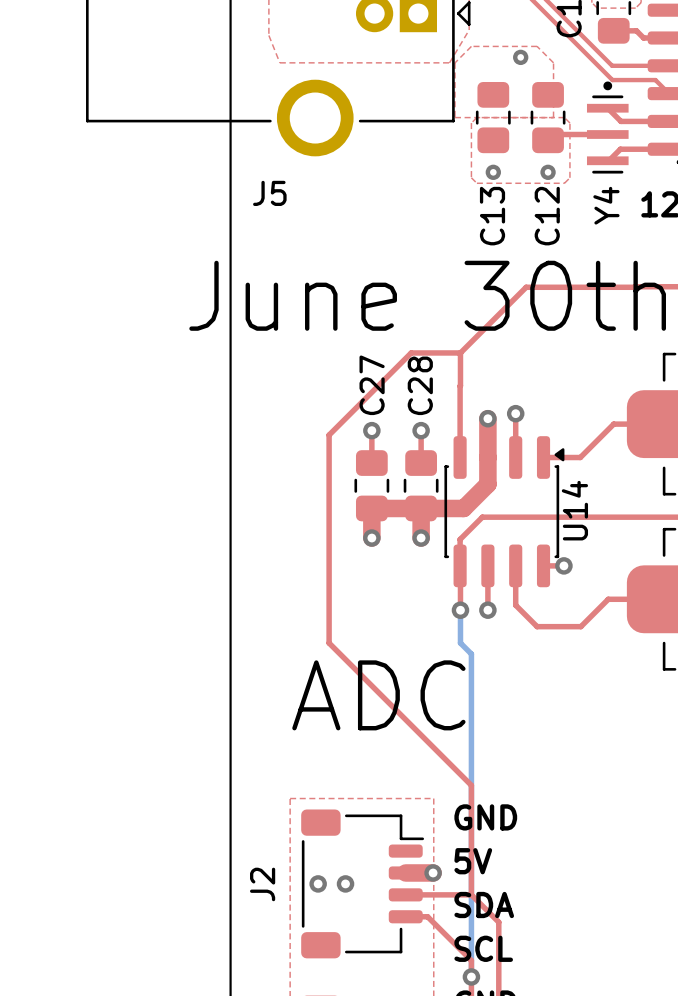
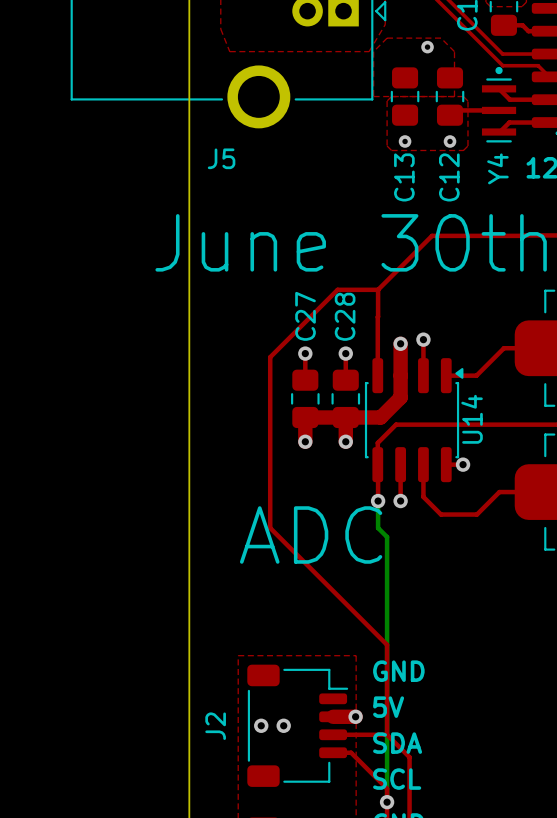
text position: ADC (378, 695) -> ADC (311, 534)

